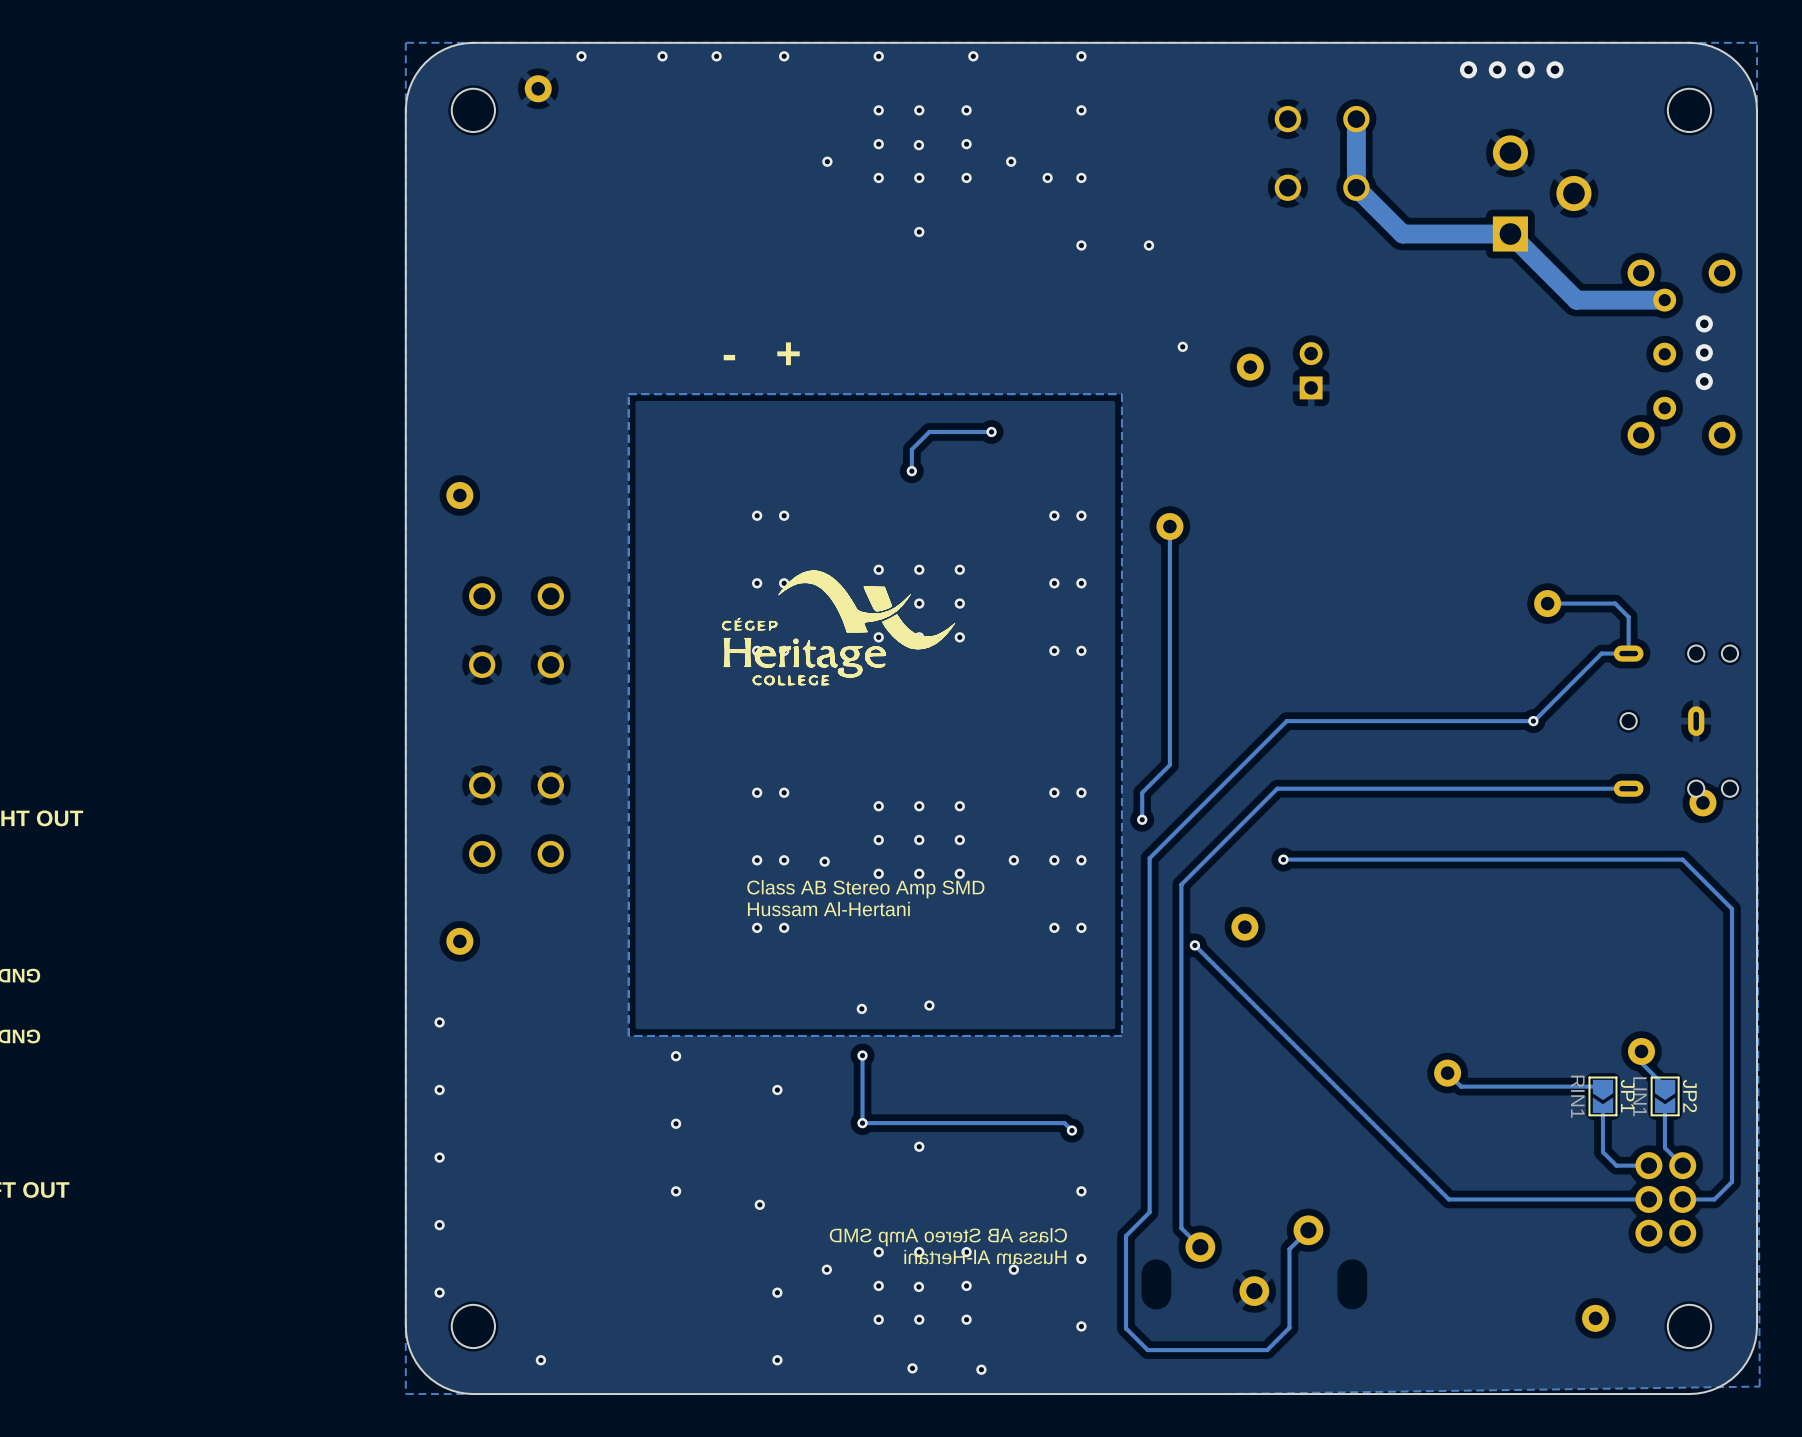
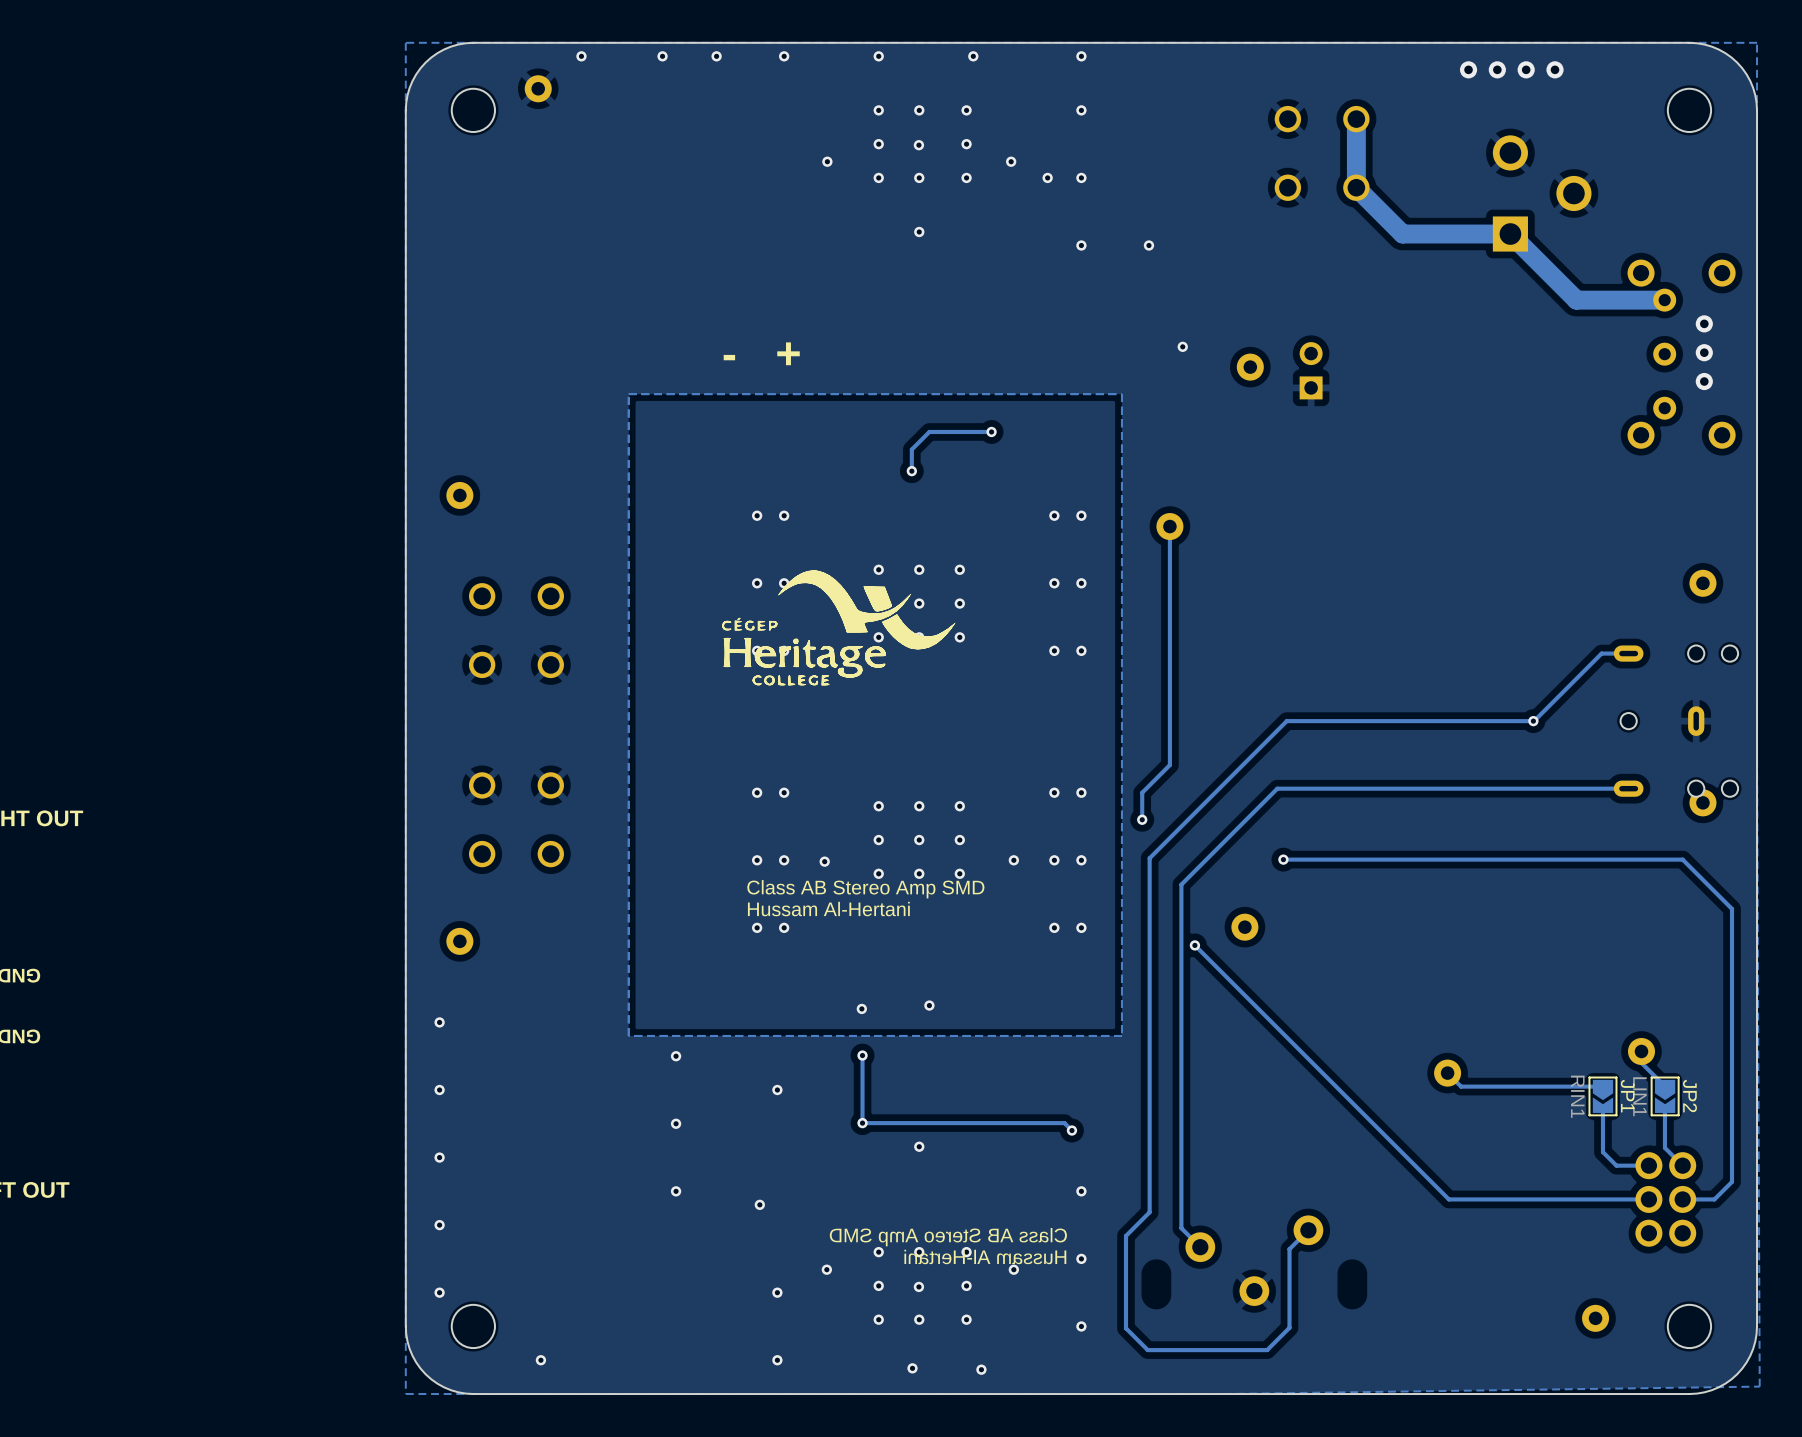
track: (1547, 603) (1615, 603) (1628, 617) (1628, 653) -> none
part position: (1547, 603) -> (1702, 583)

